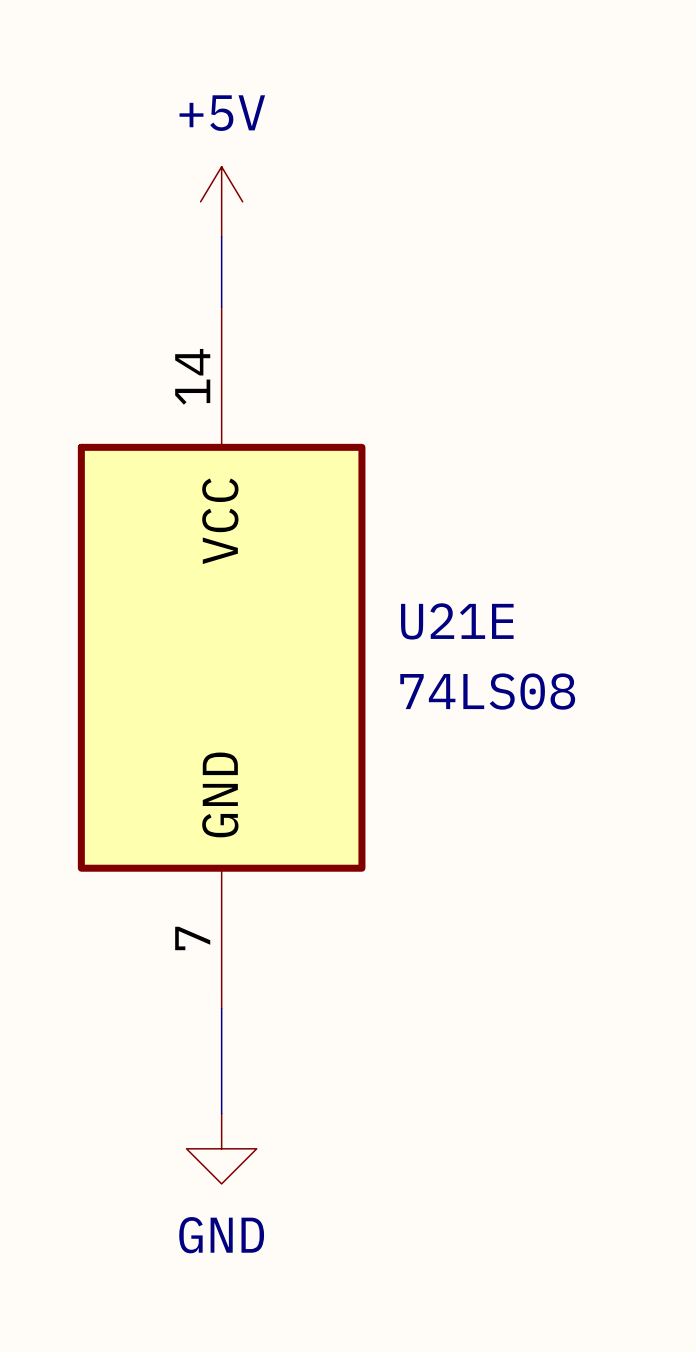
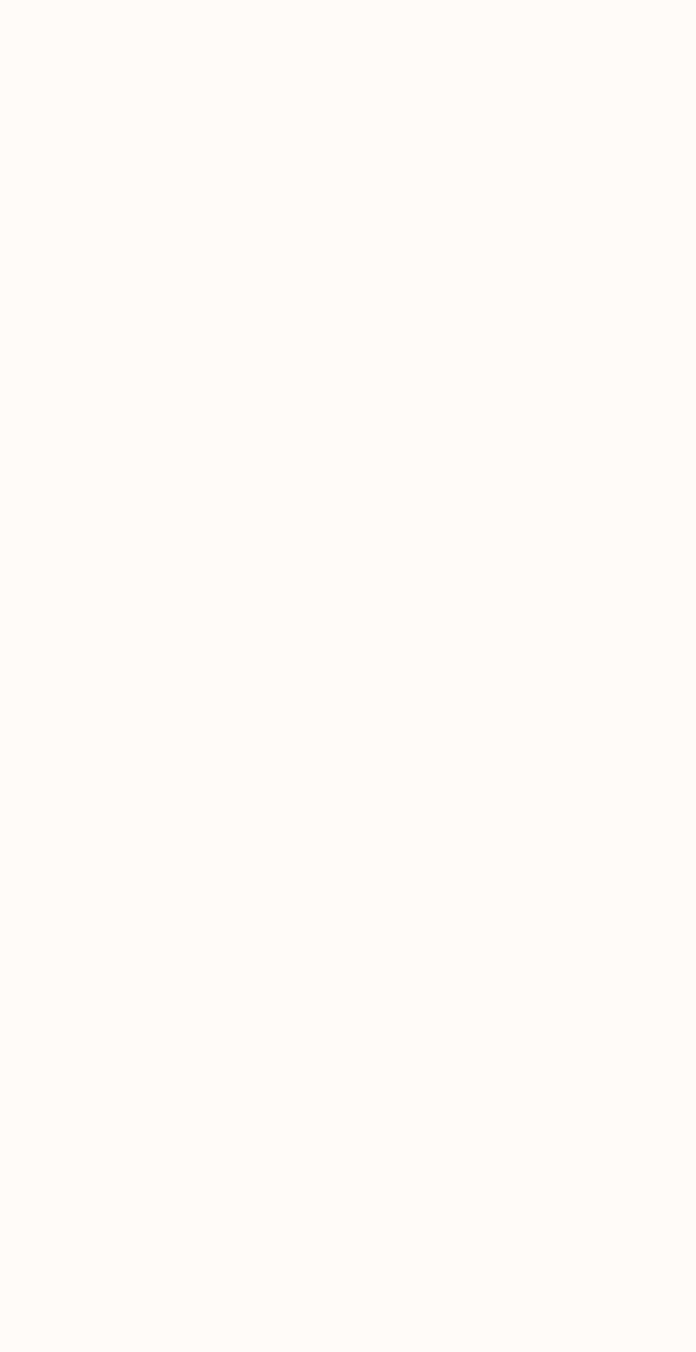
power symbol: +5V (221, 201) -> none
wire: (221, 236) (221, 307) -> none
U21E: 74LS08 (221, 657) -> none
wire: (221, 1008) (221, 1113) -> none
power symbol: GND (221, 1148) -> none

